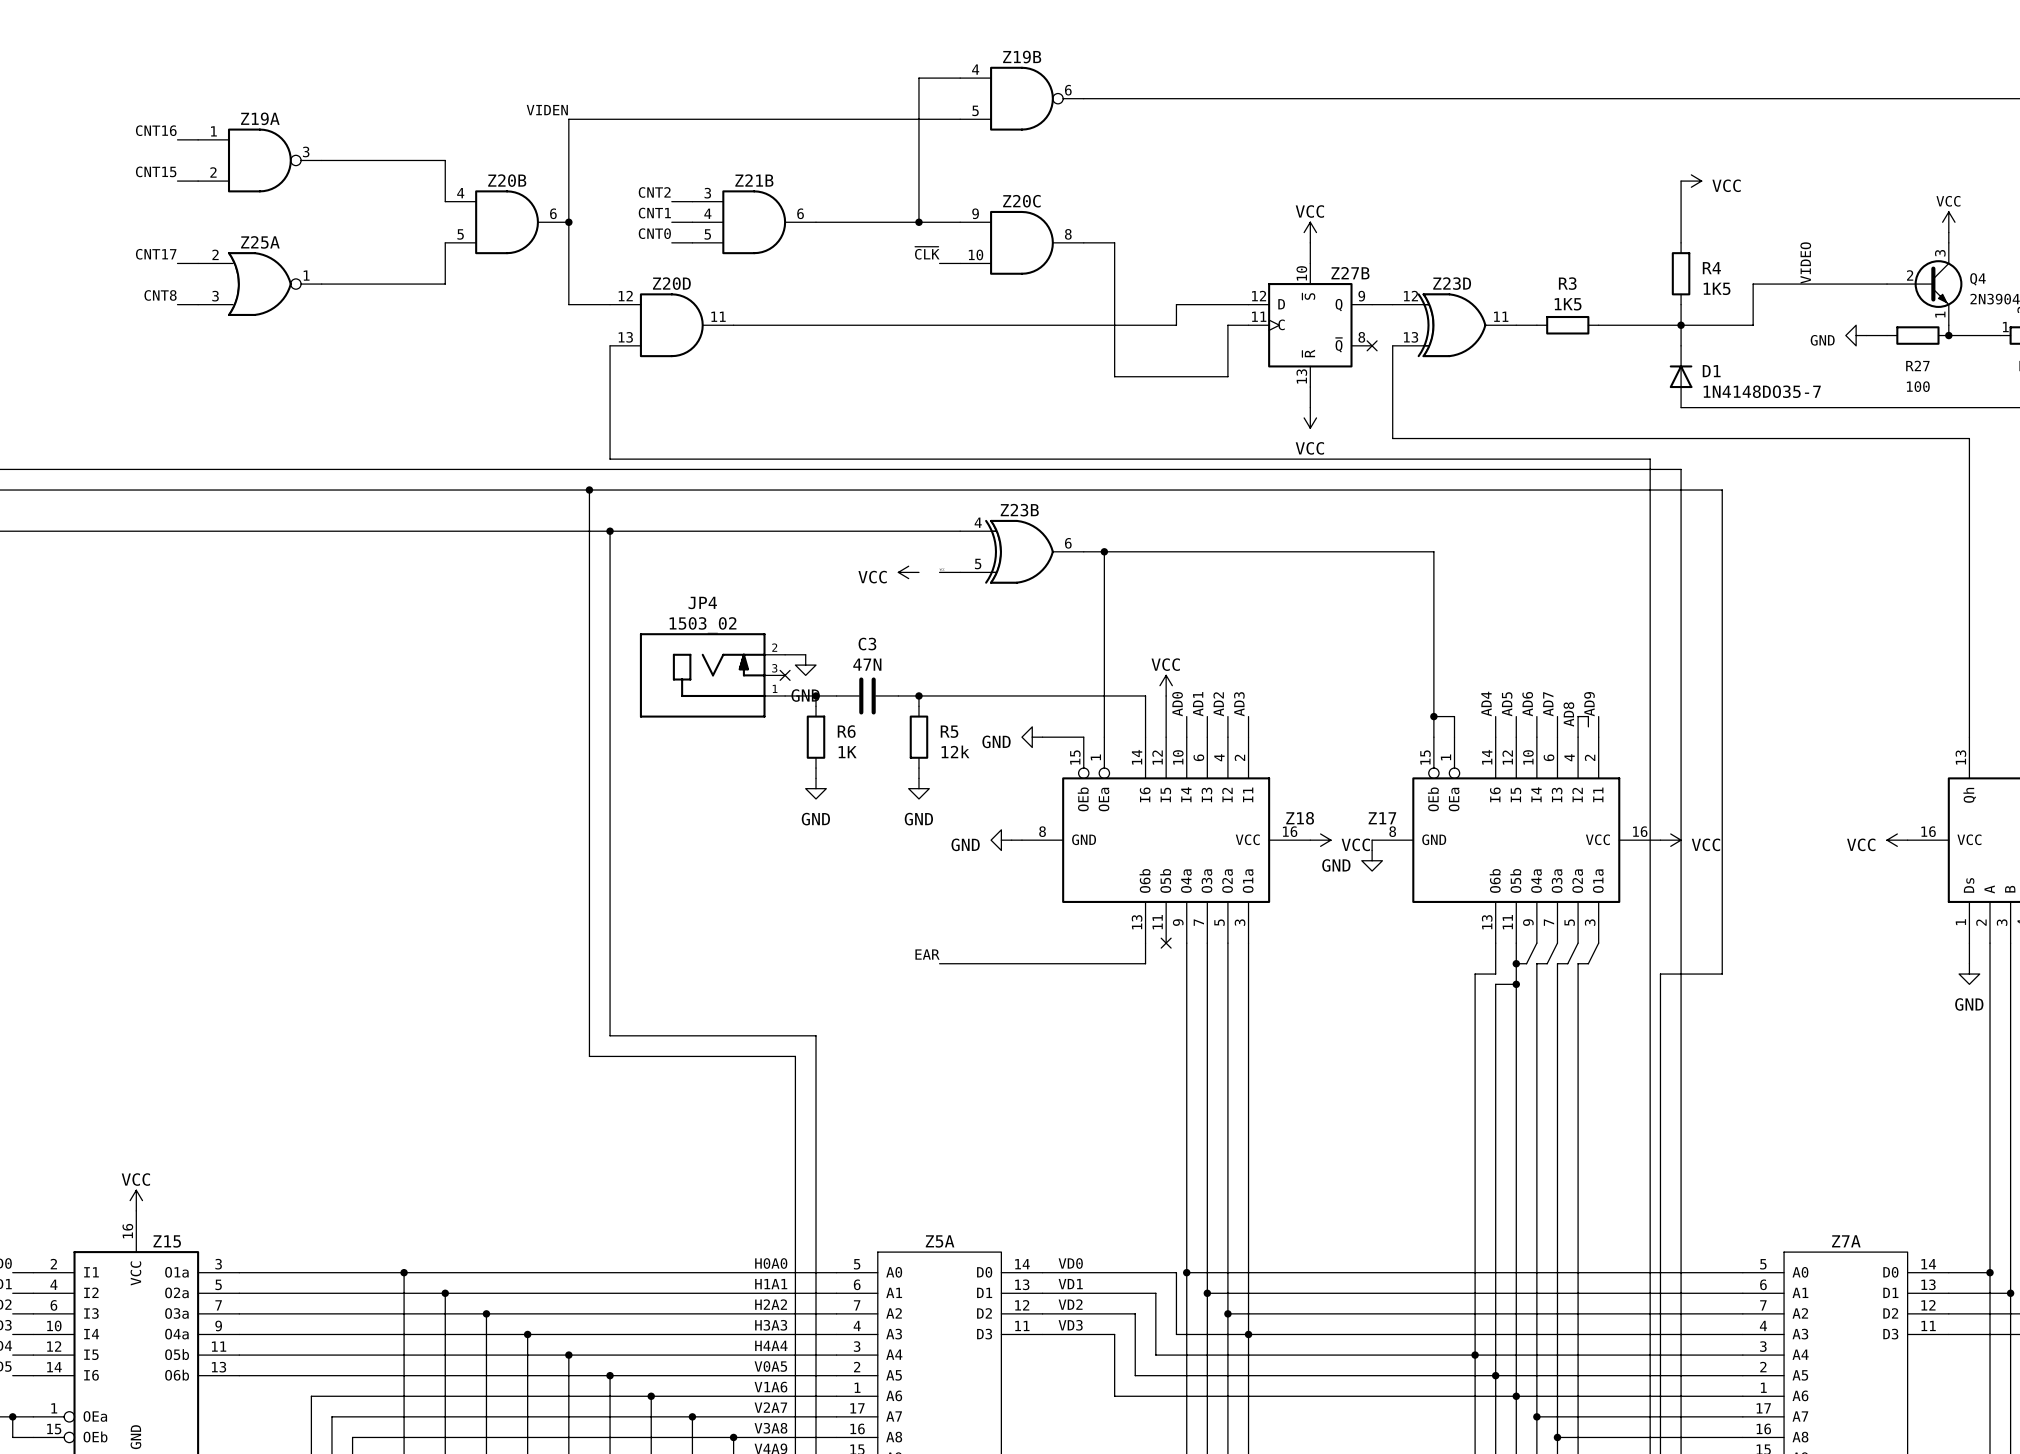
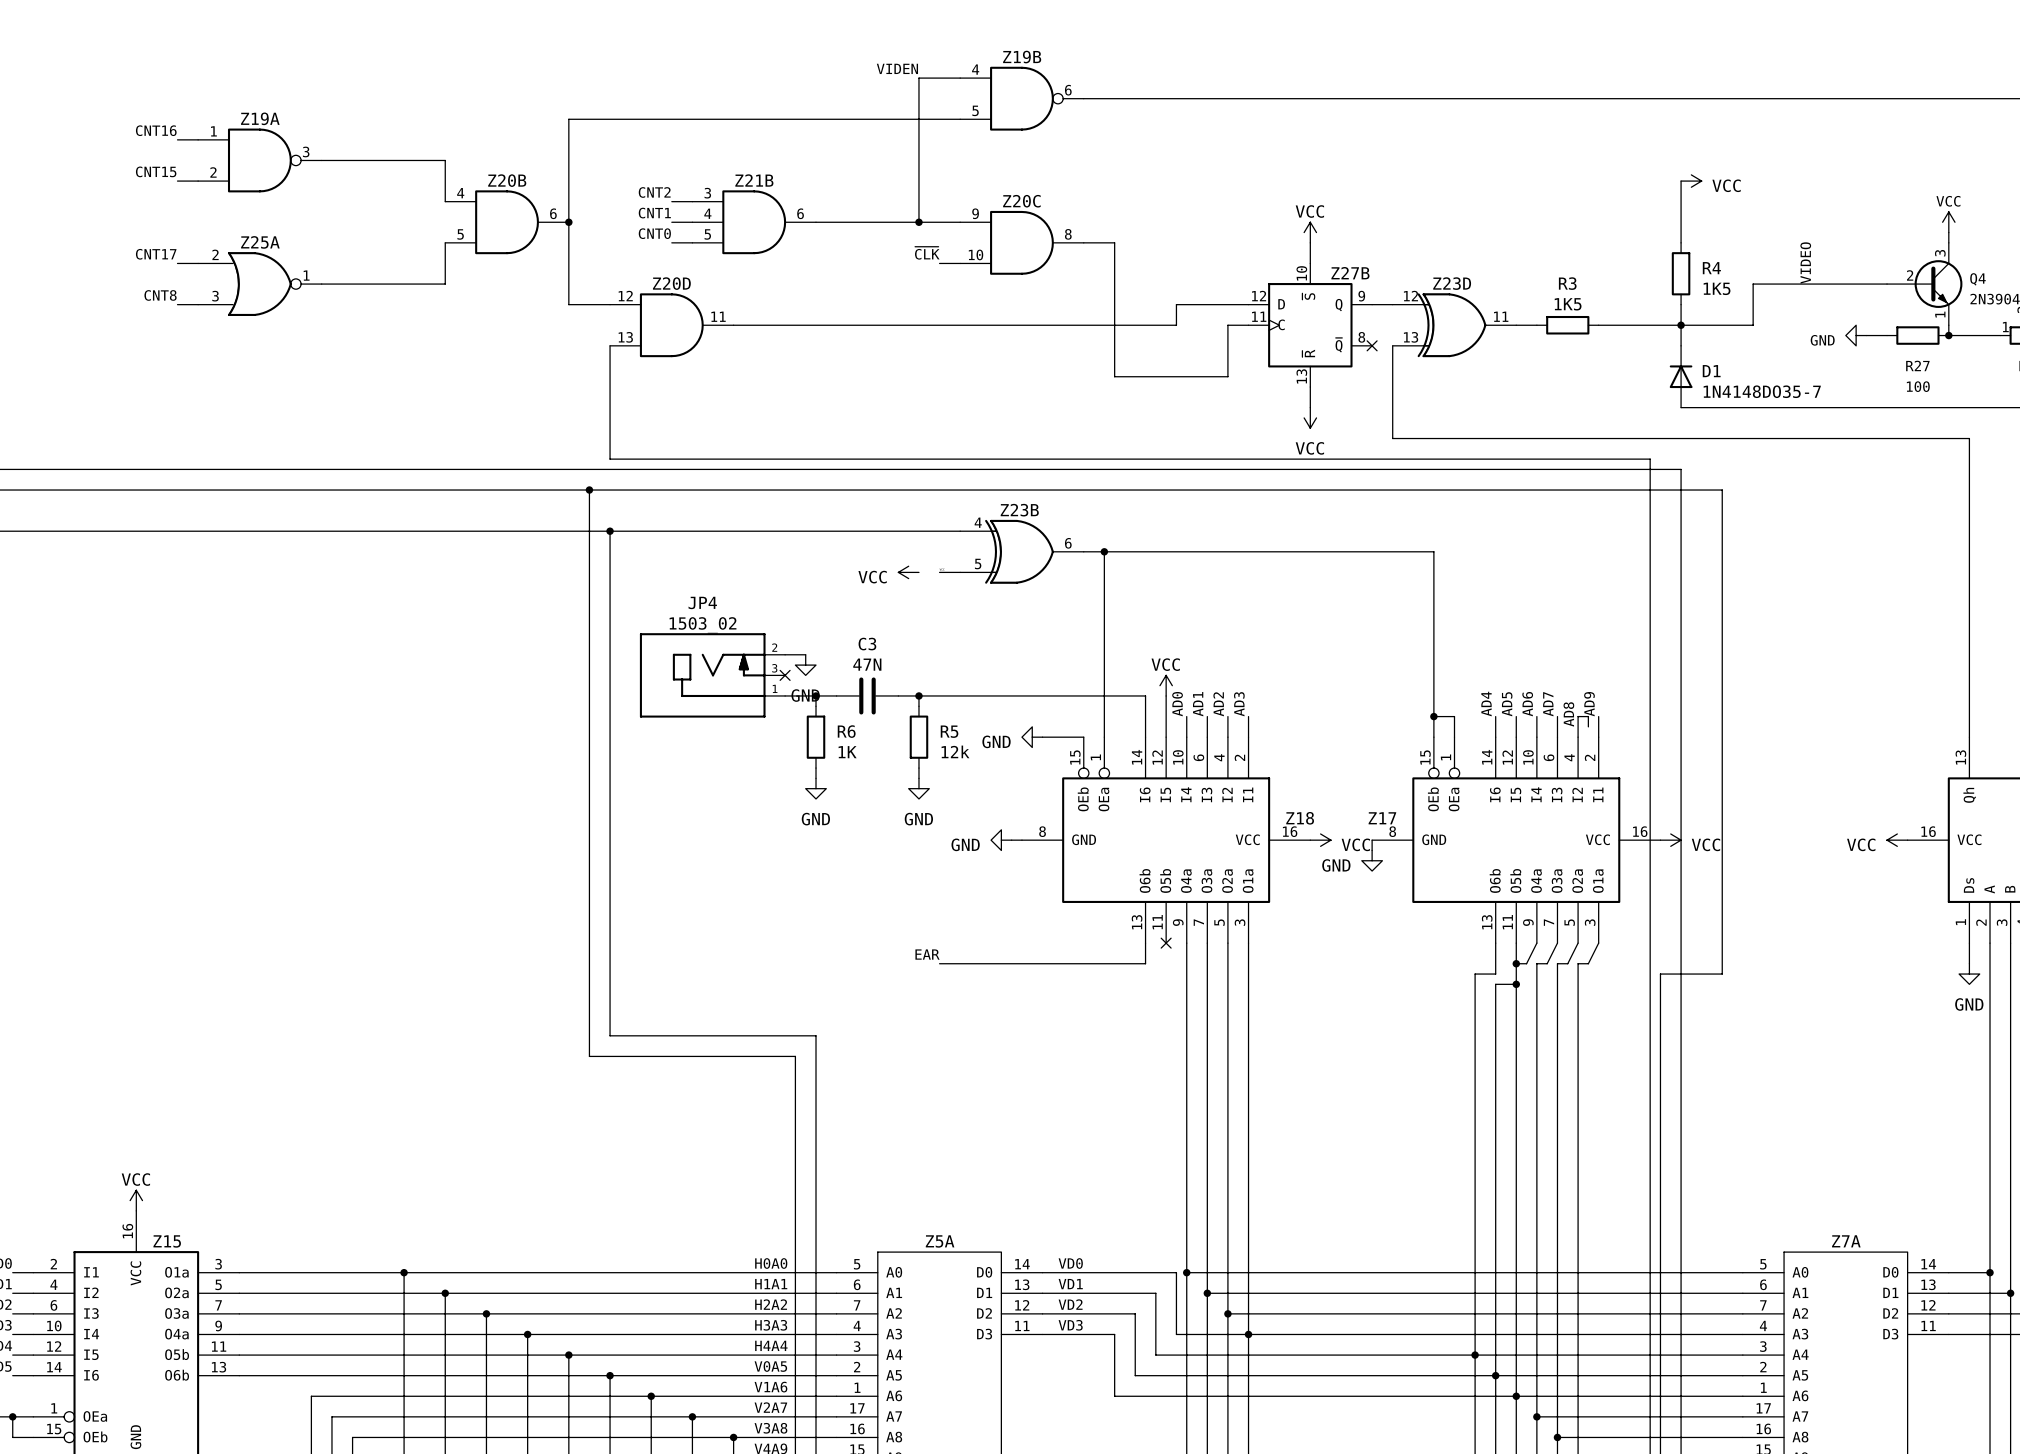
label: none -> VIDEN (897, 68)
label: VIDEN (547, 110) -> none

